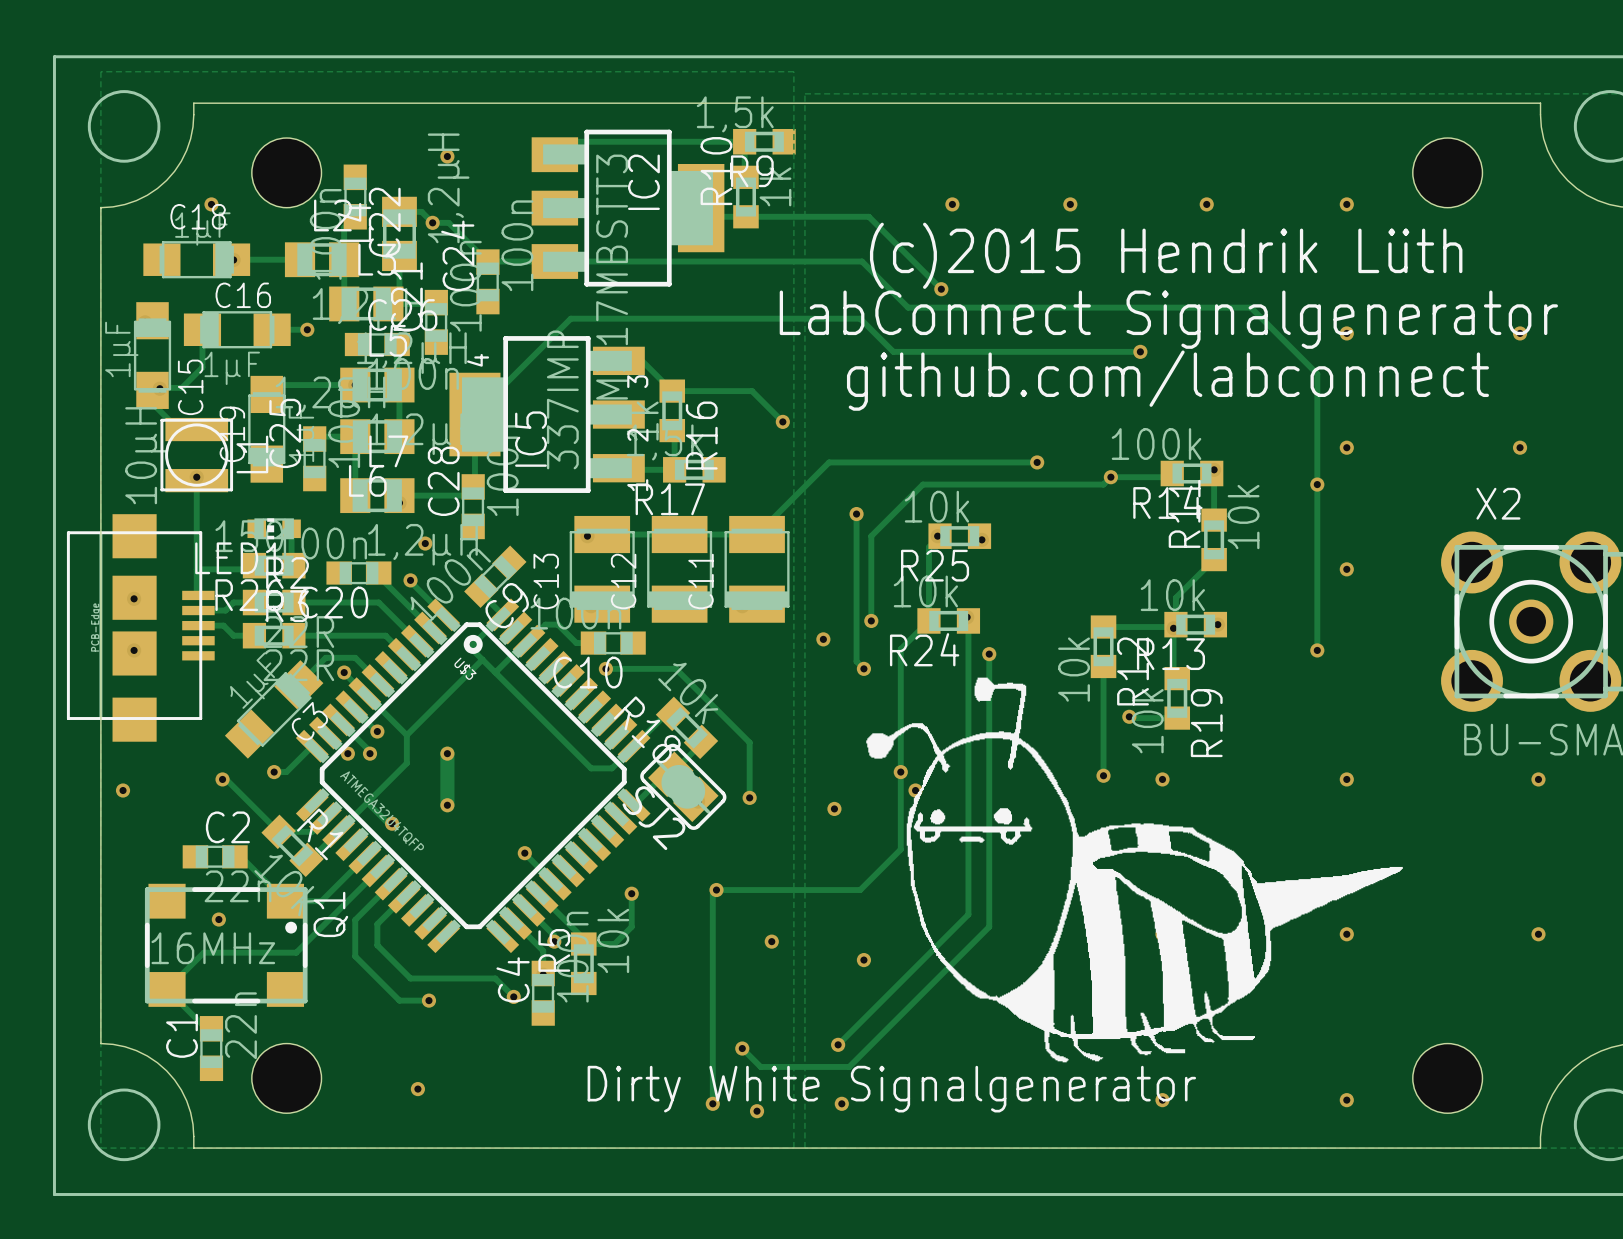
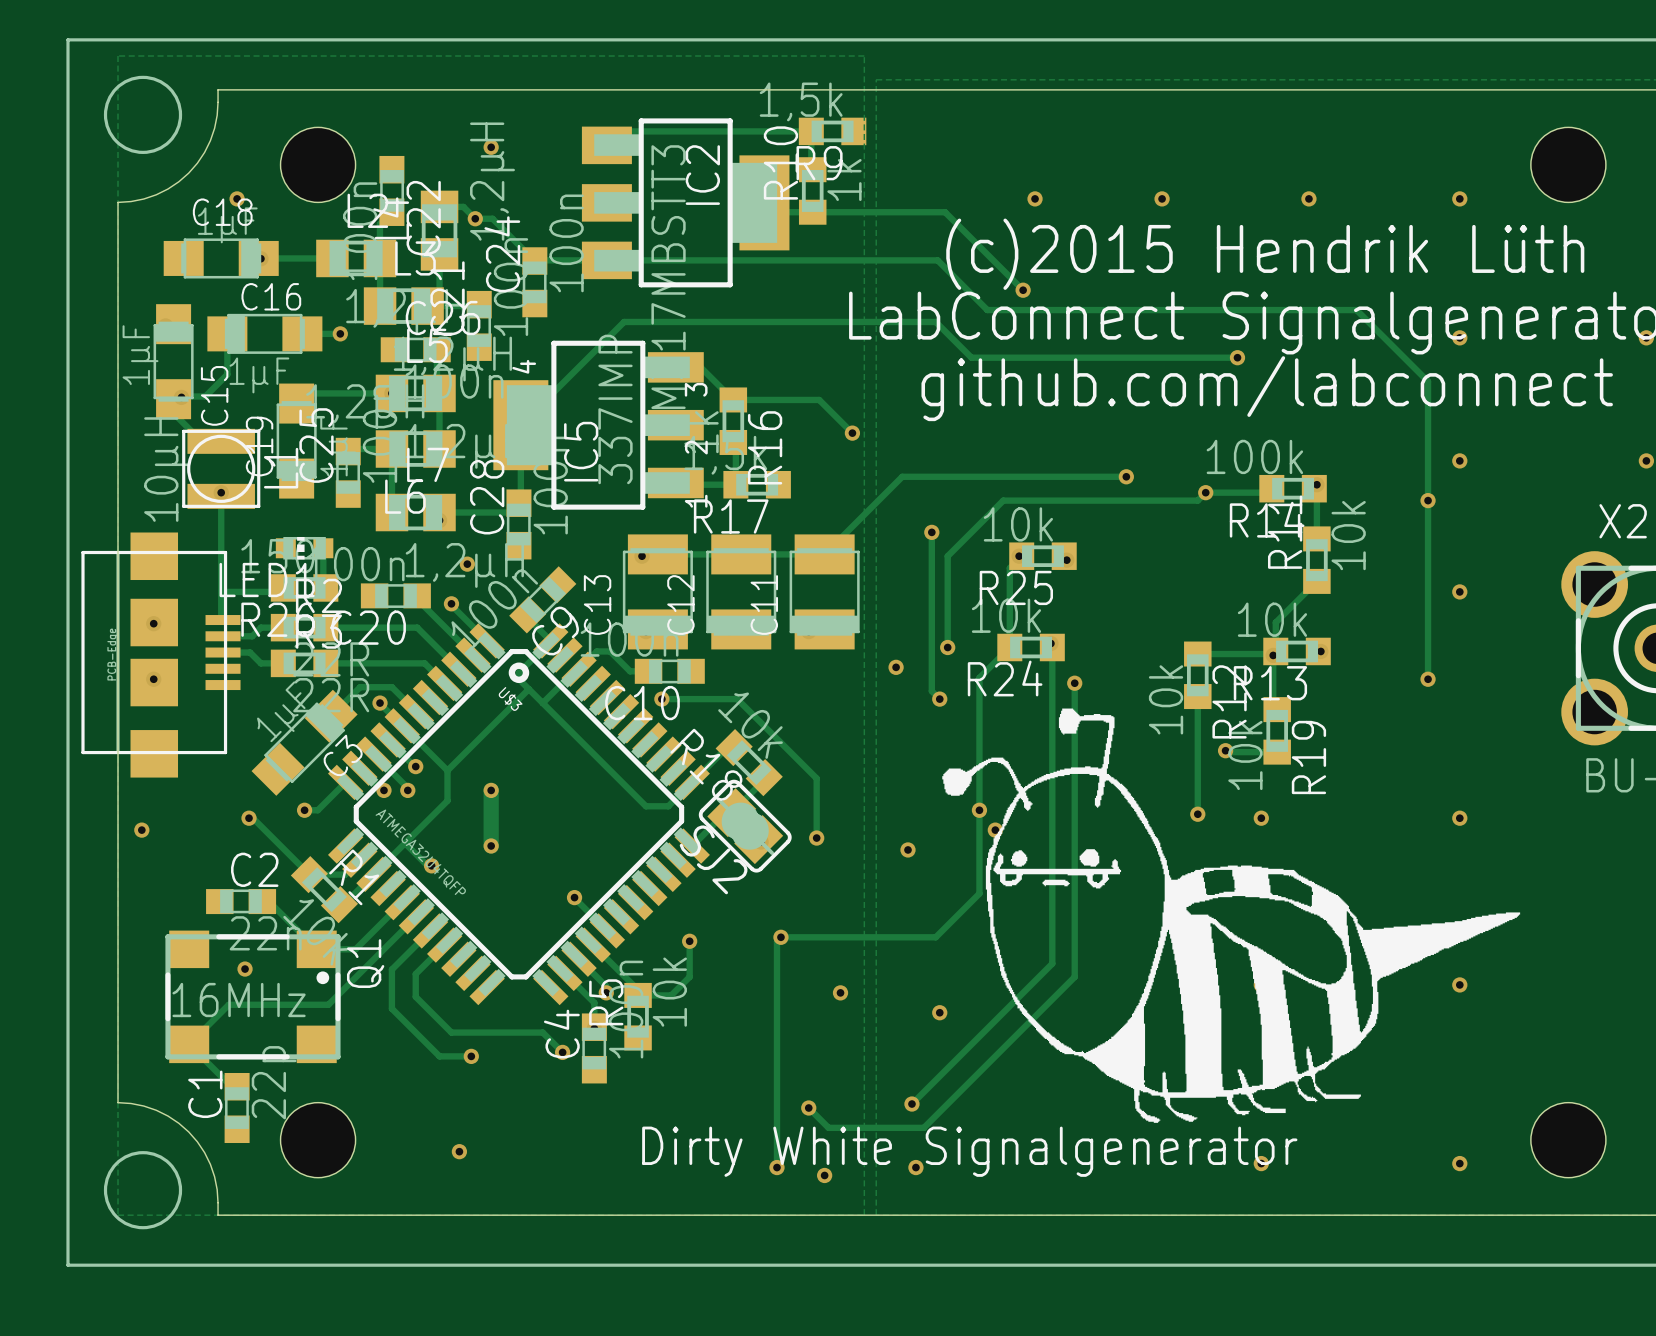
C1 value: 22n (240, 1025) -> 22p (274, 1082)

